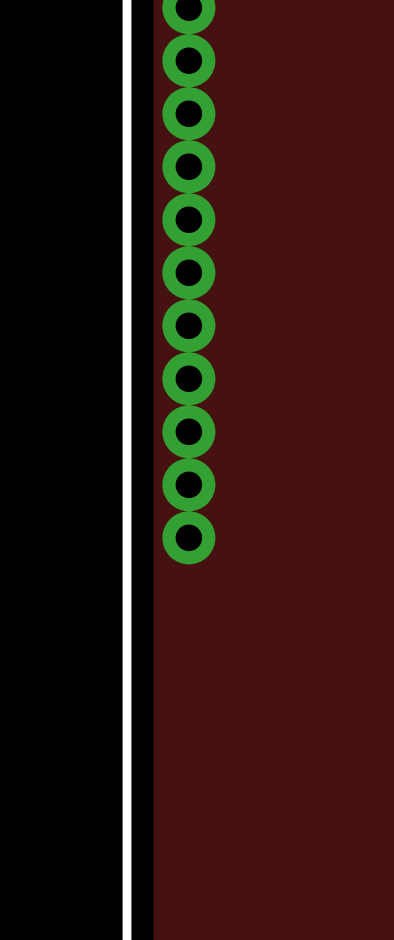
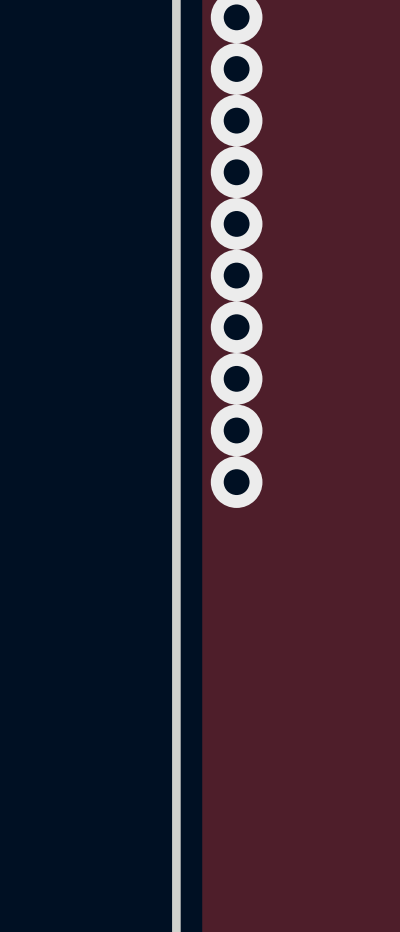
via: (188, 537) -> none

